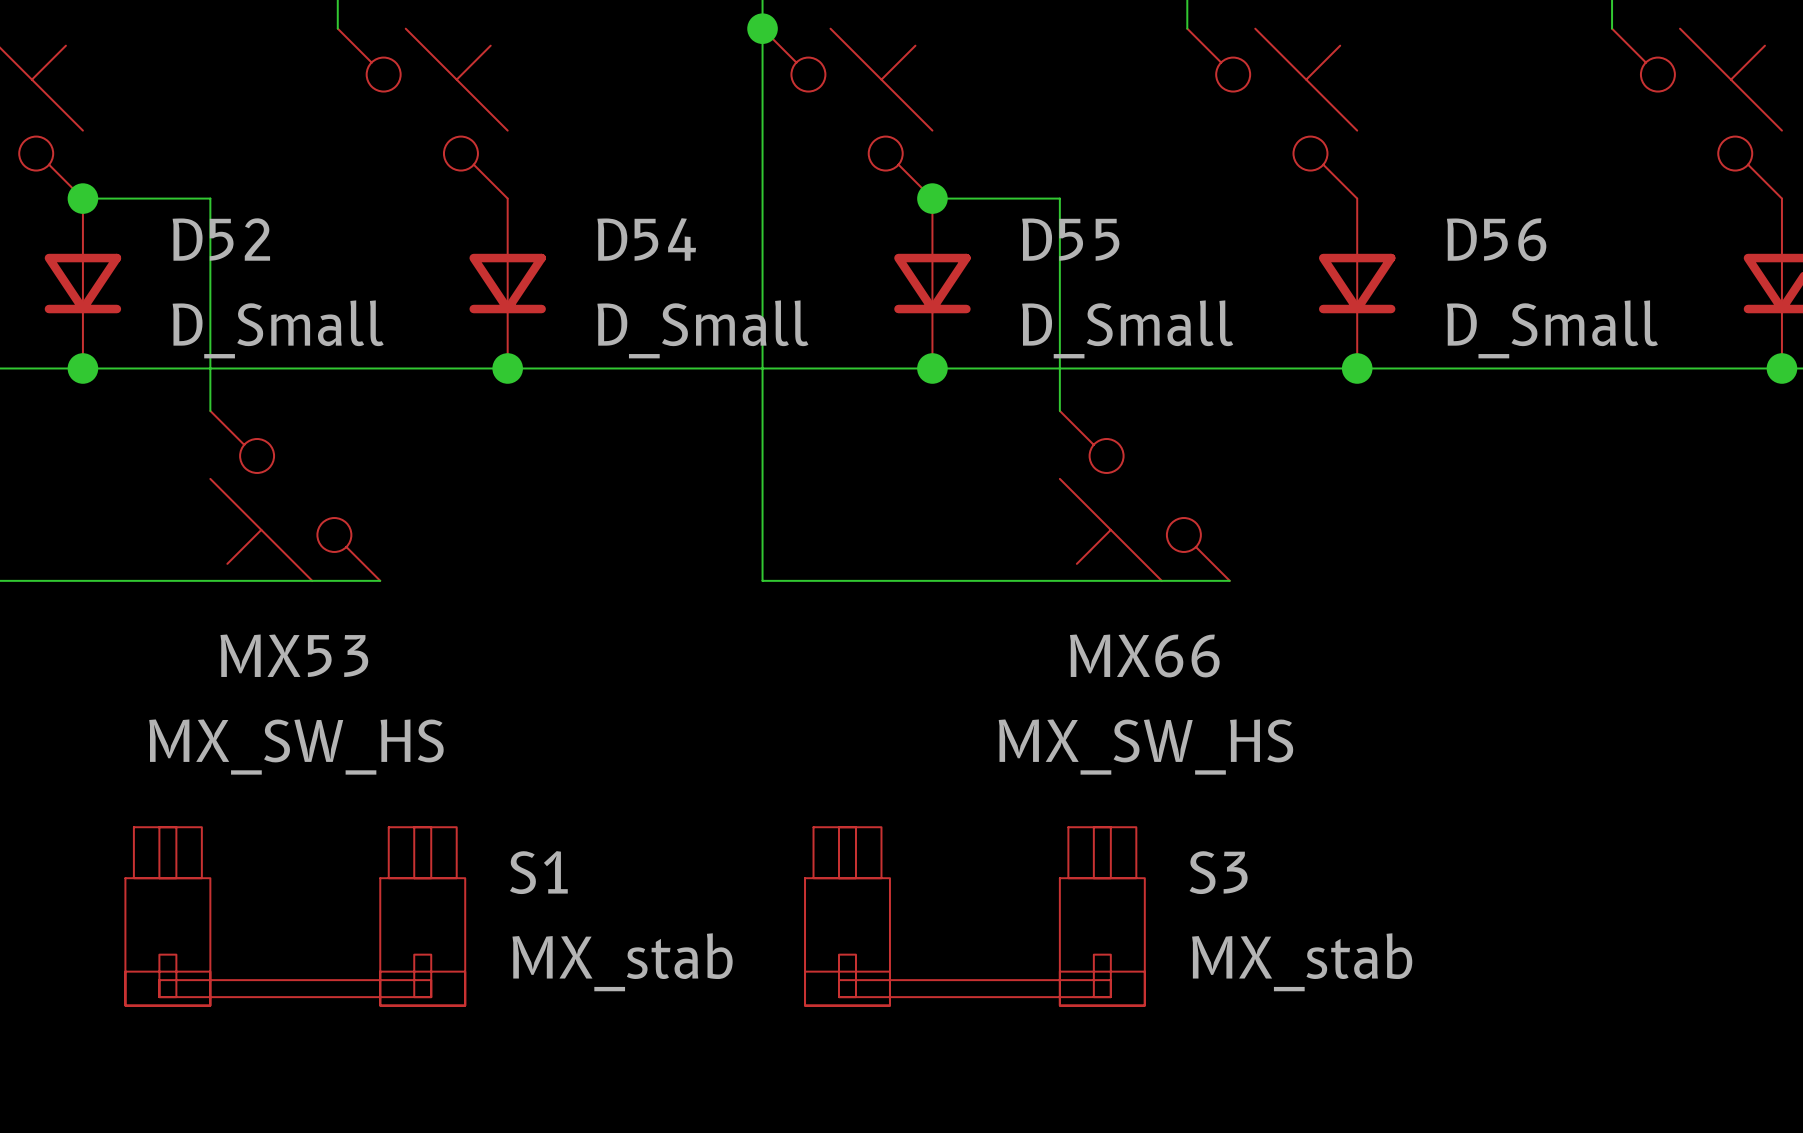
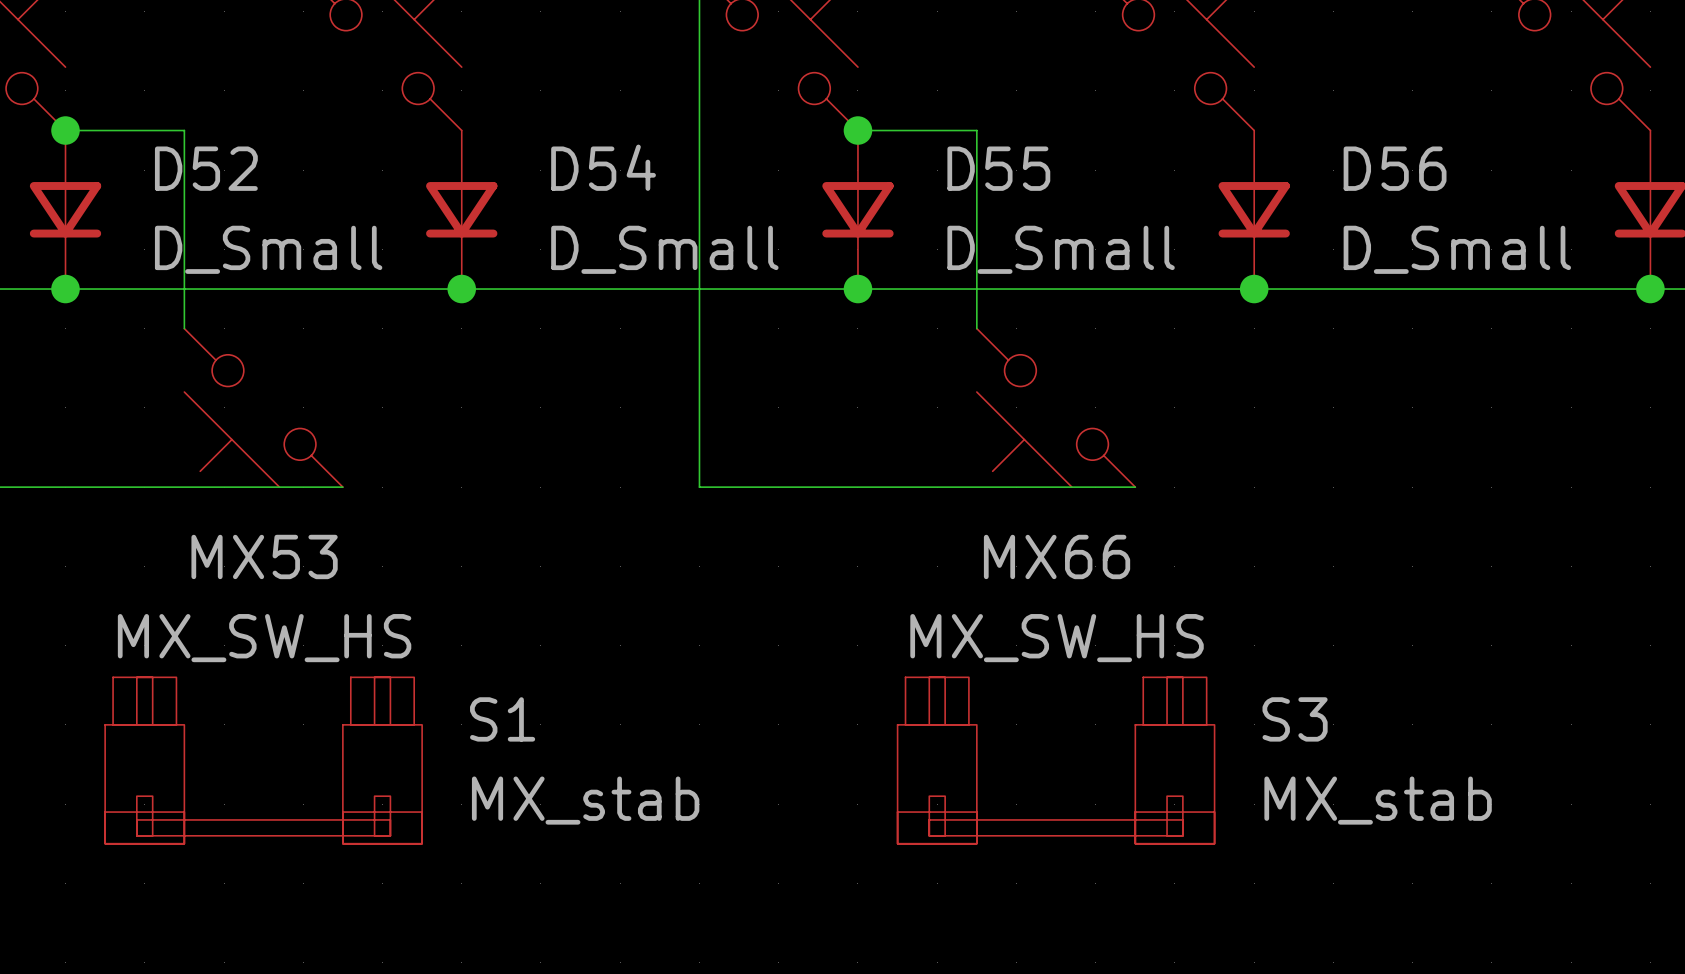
S1 position: (295, 916) -> (263, 760)
S3 position: (974, 916) -> (1056, 760)

